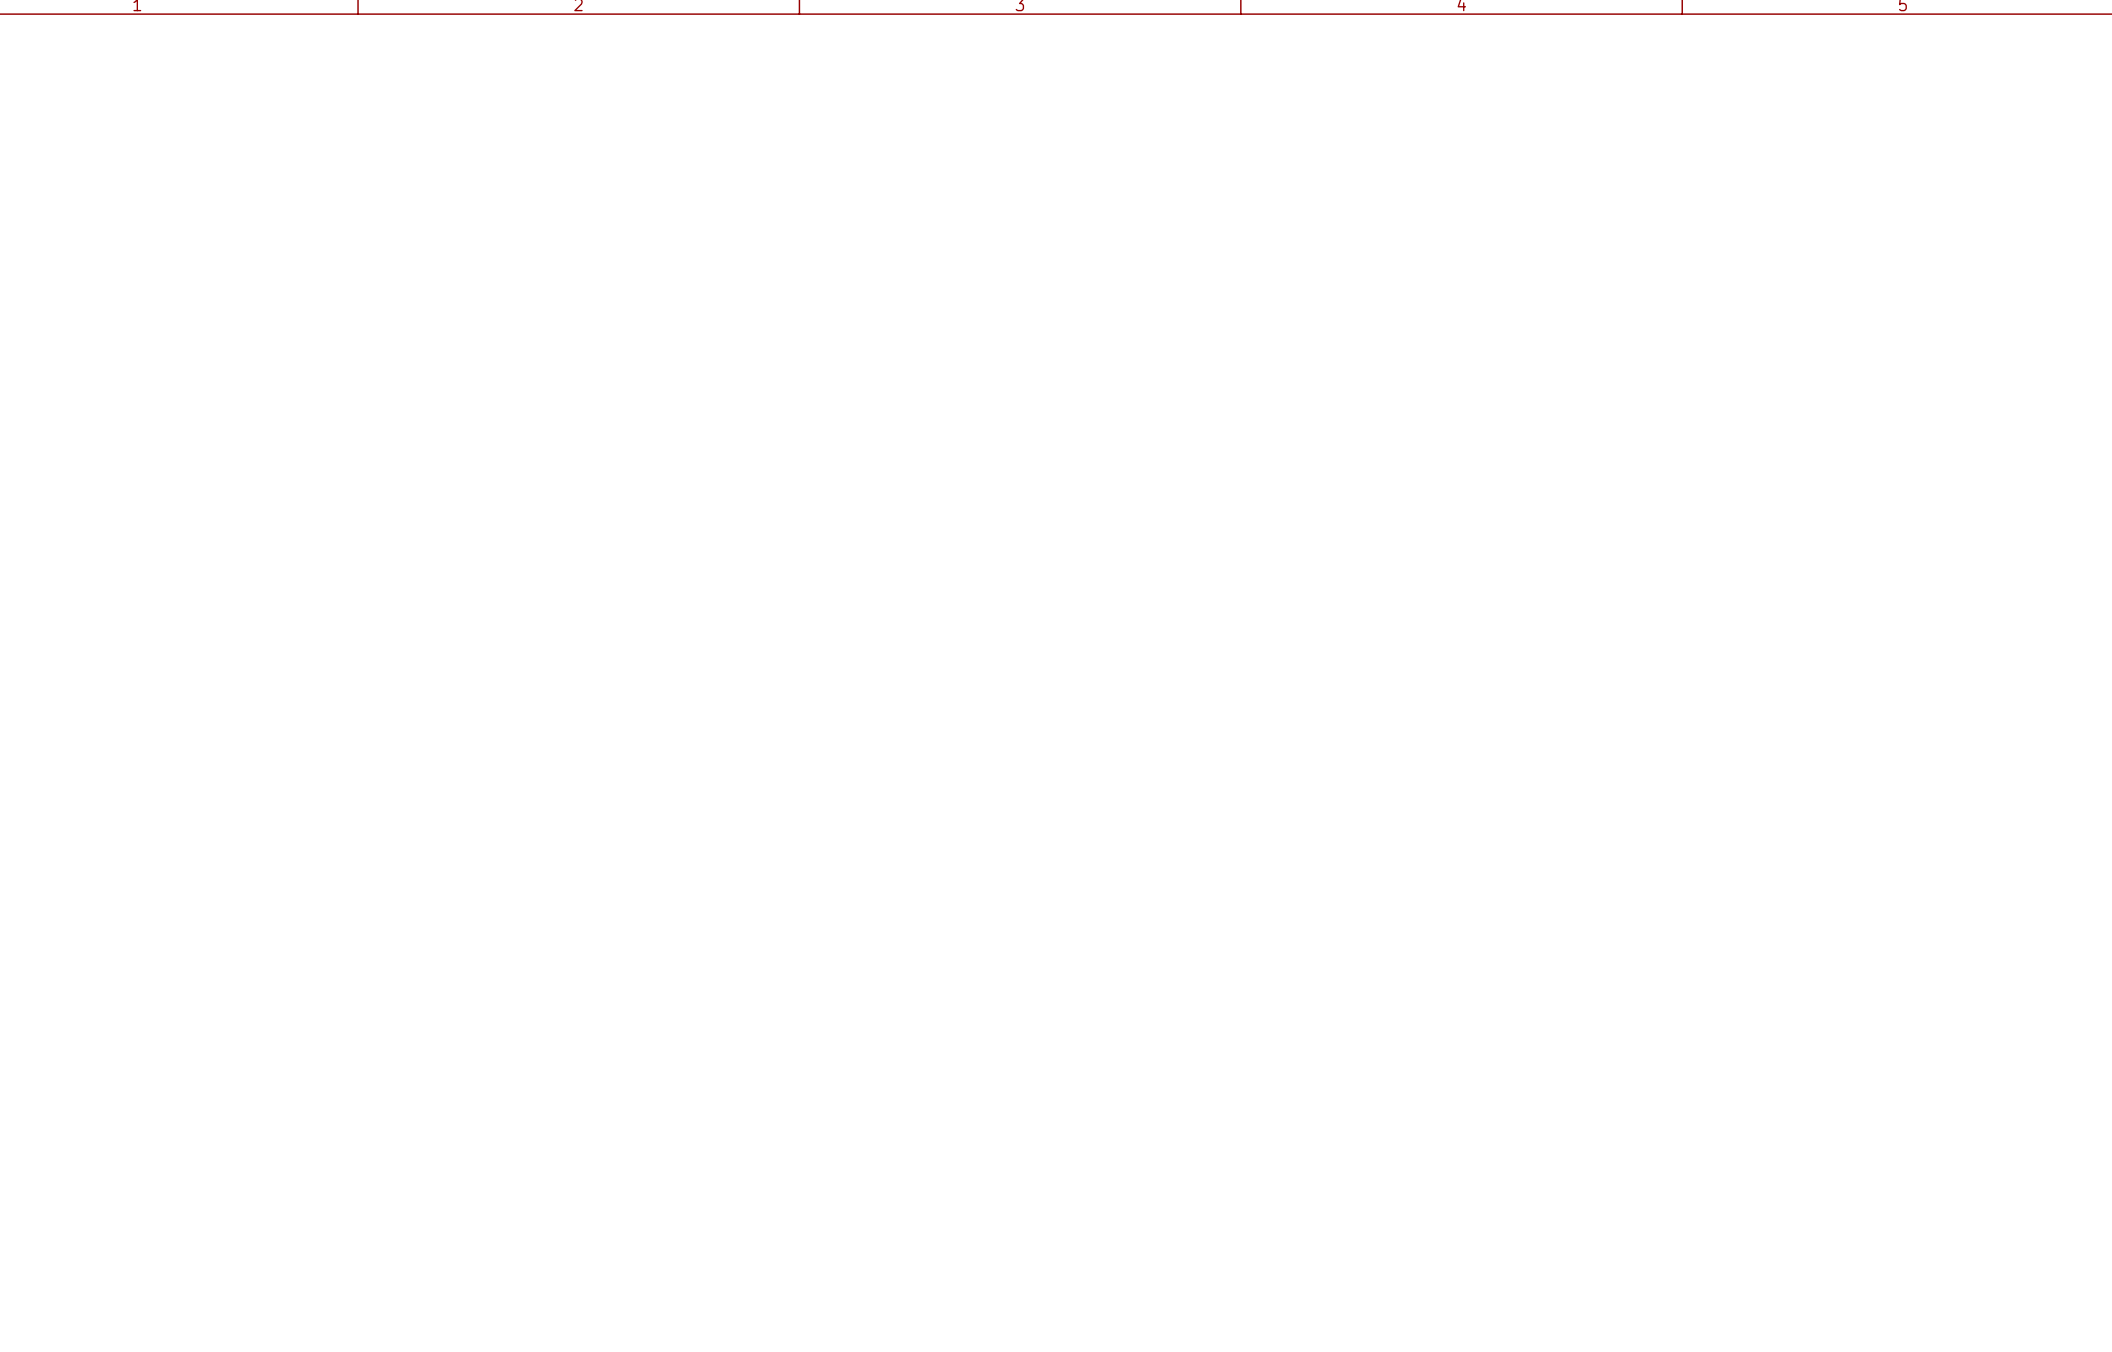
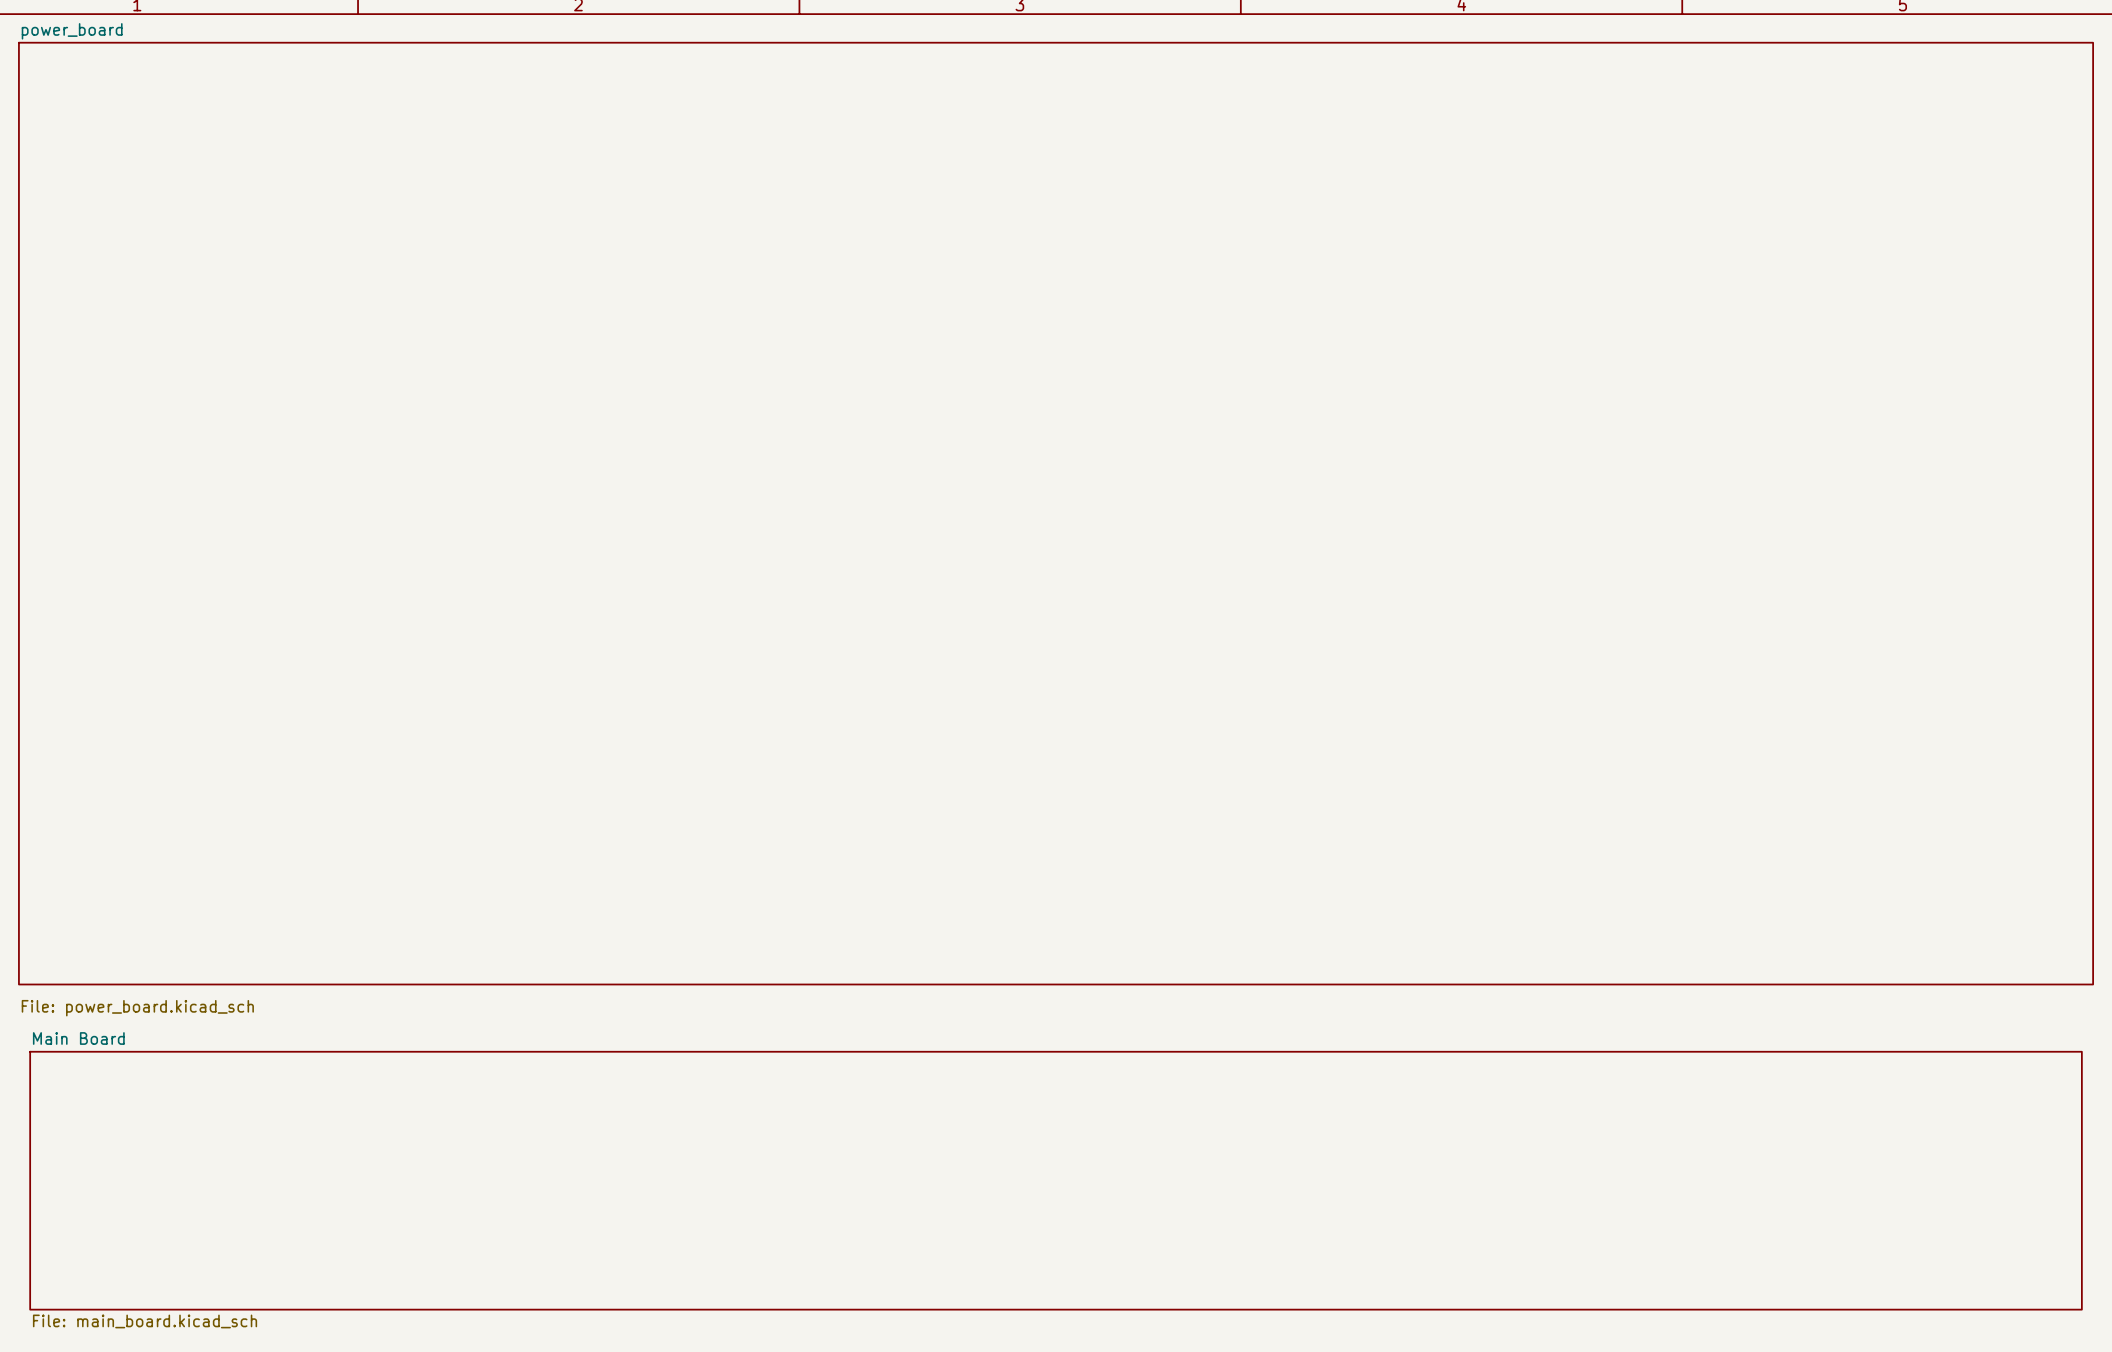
sheet power_board: none -> File: power_board.kicad_sch (1056, 513)
sheet Main Board: none -> File: main_board.kicad_sch (1056, 1180)

